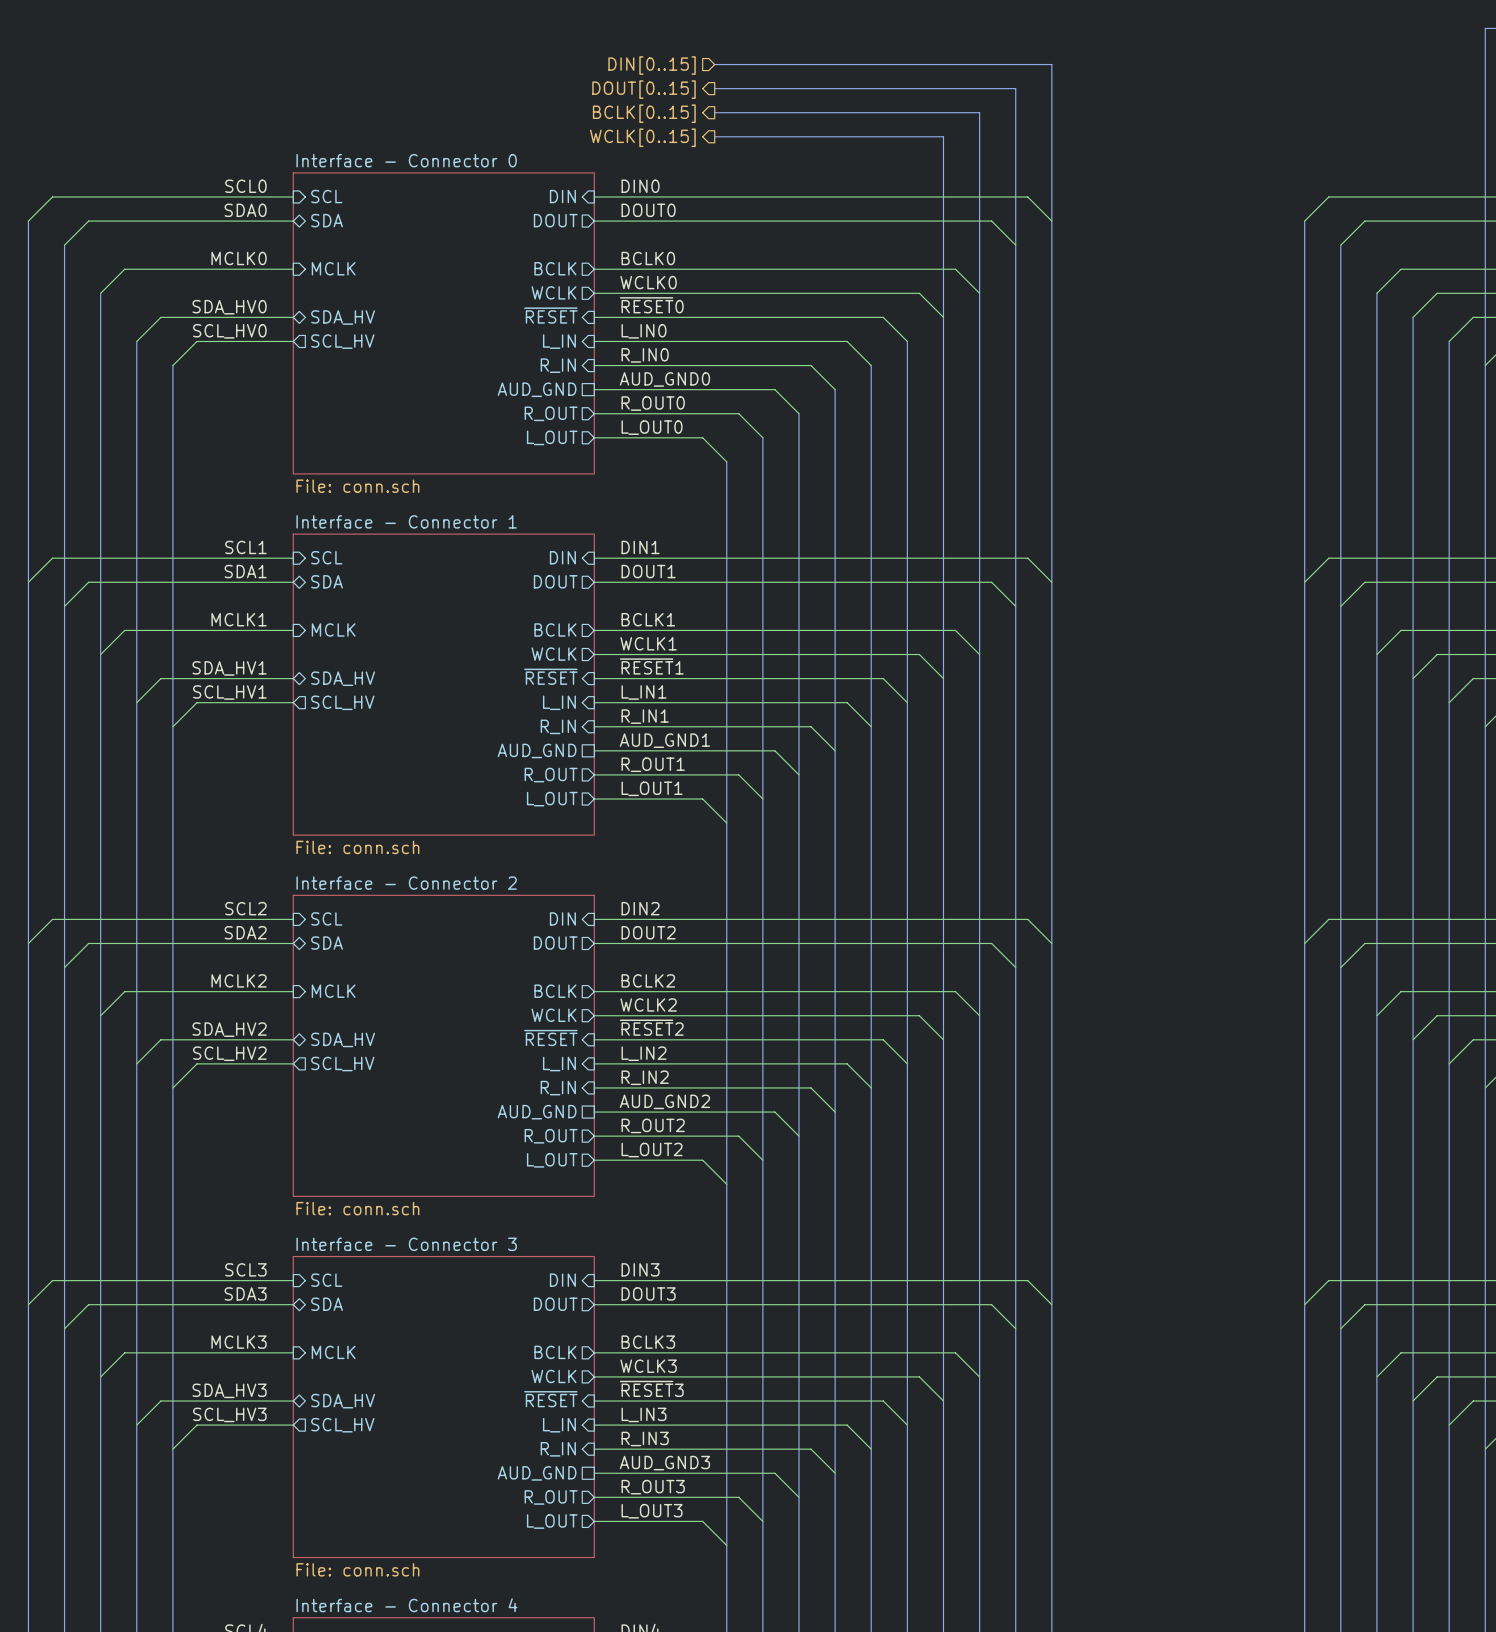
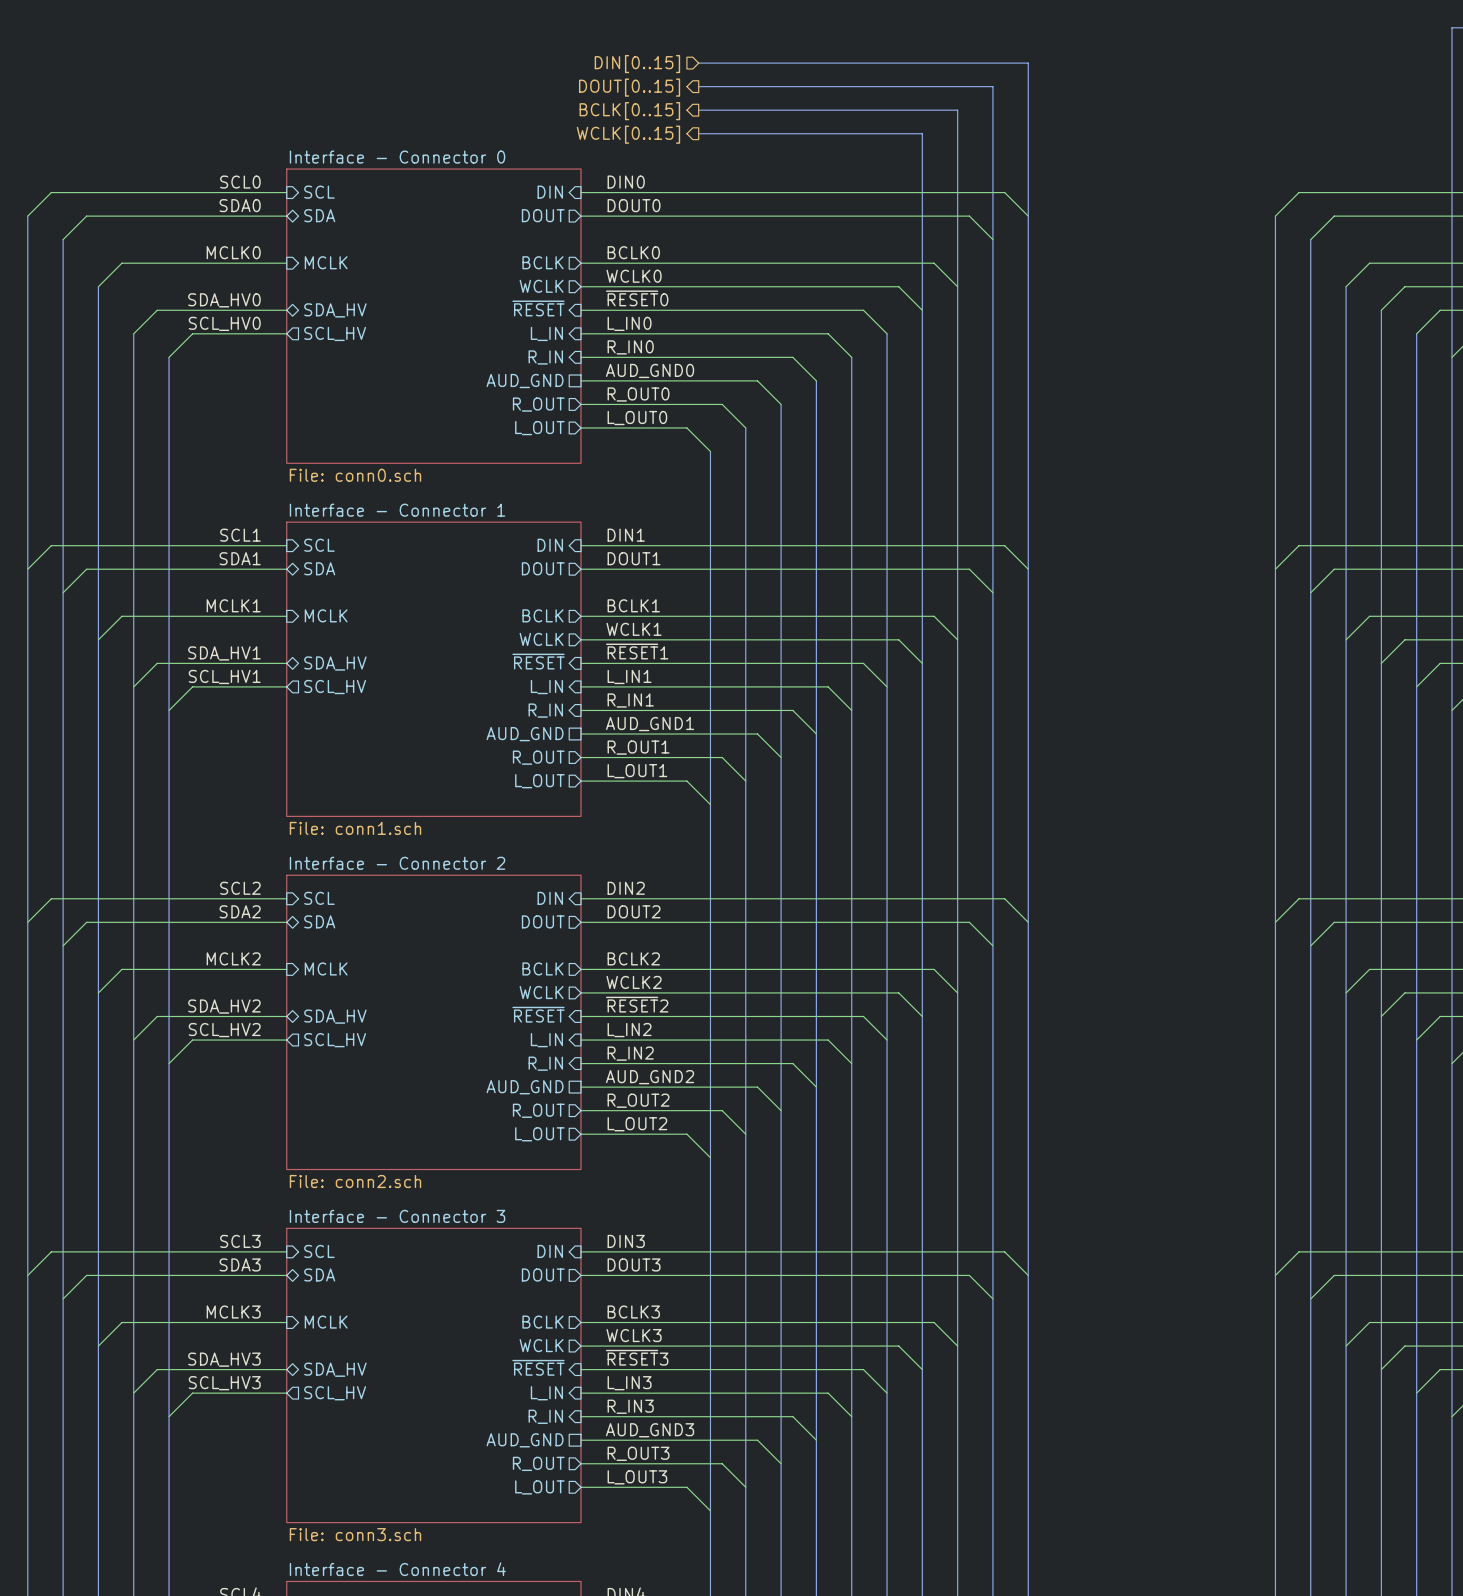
sheet Interface - Connector 0 value: File: conn.sch (357, 486) -> File: conn0.sch (355, 475)
sheet Interface - Connector 1 value: File: conn.sch (357, 847) -> File: conn1.sch (355, 828)
sheet Interface - Connector 2 value: File: conn.sch (357, 1208) -> File: conn2.sch (355, 1181)
sheet Interface - Connector 3 value: File: conn.sch (357, 1569) -> File: conn3.sch (355, 1534)

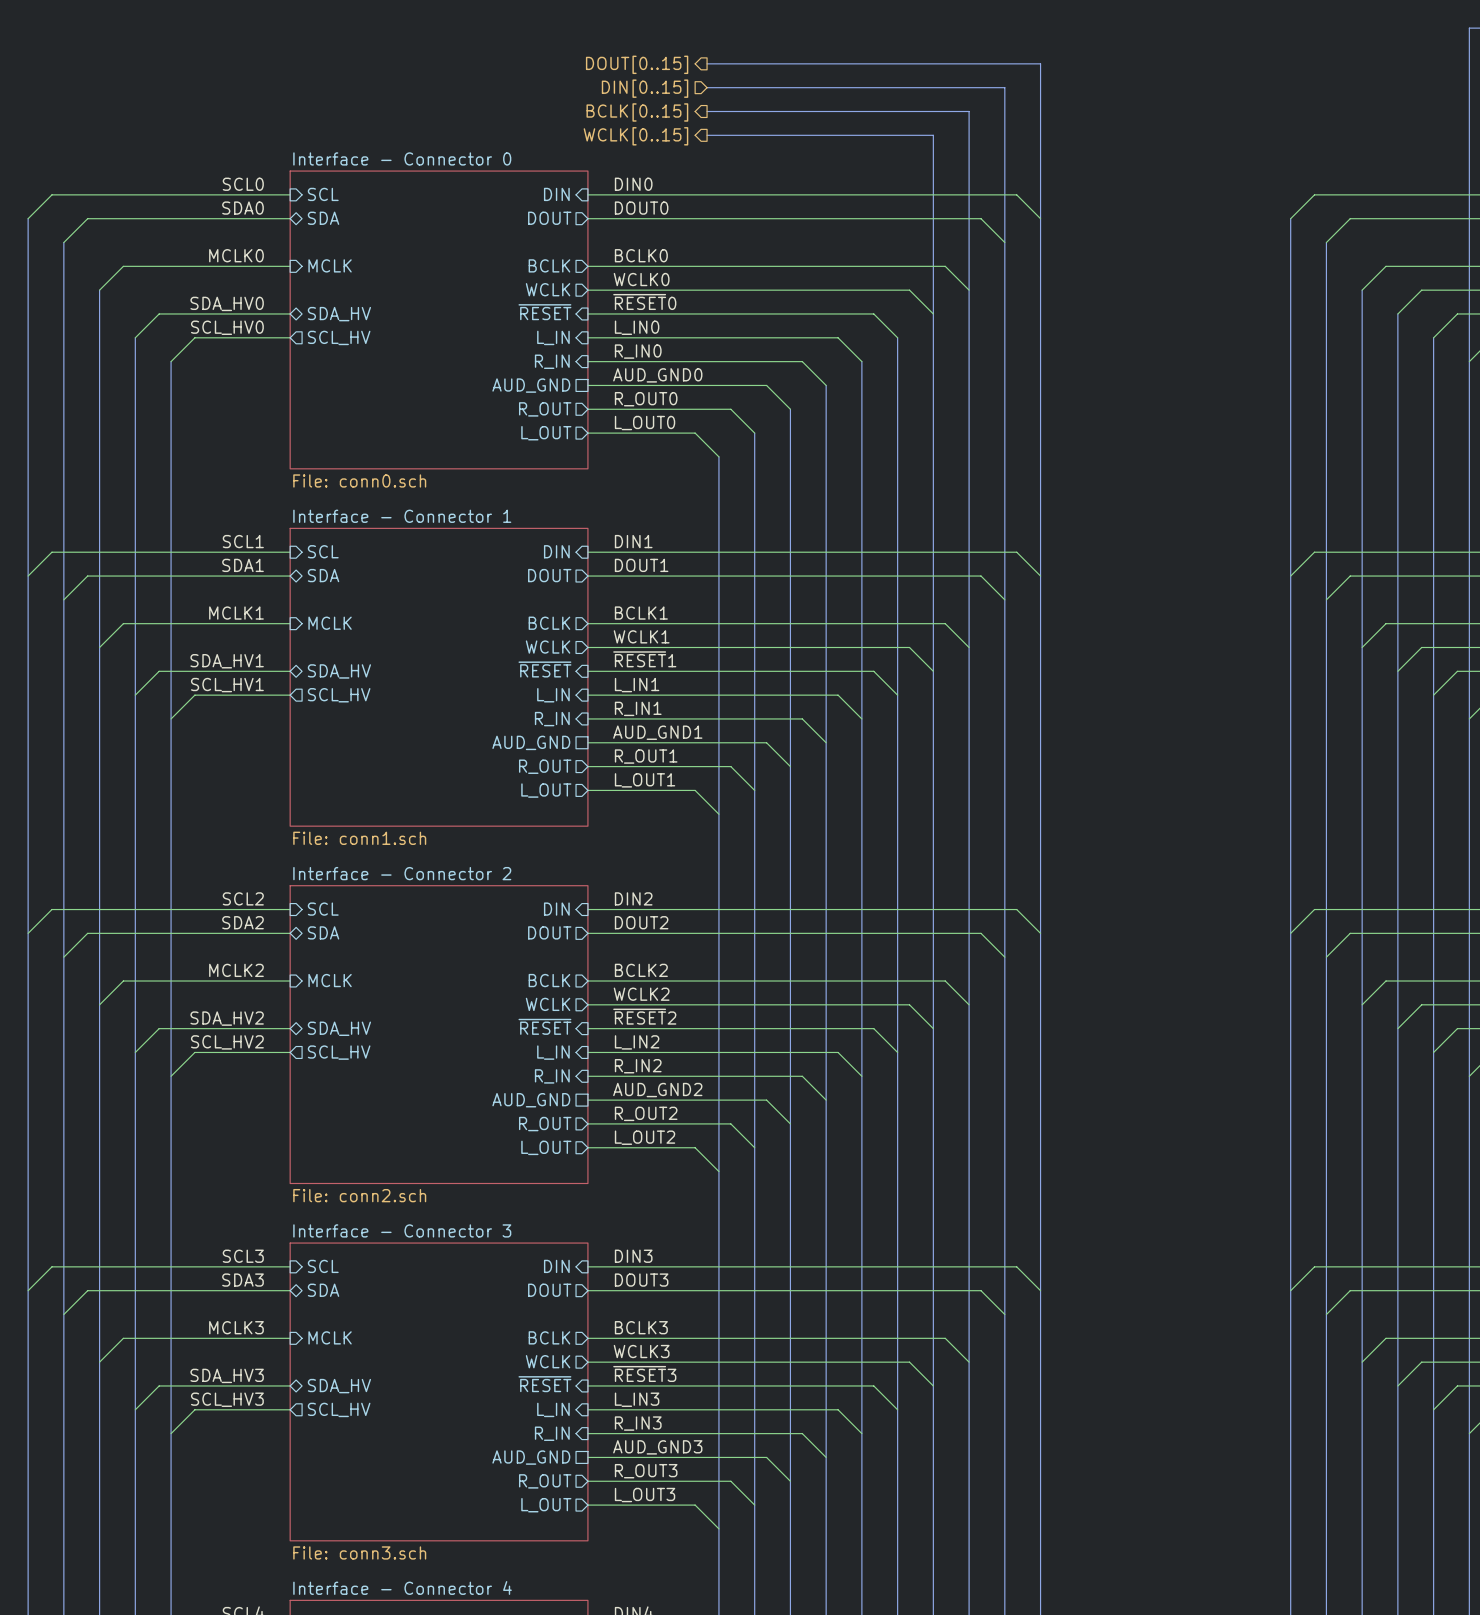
hierarchical label shape: input (637, 64) -> output (637, 64)
hierarchical label: DIN[0..15] (637, 64) -> DOUT[0..15] (637, 64)
hierarchical label shape: output (629, 87) -> input (645, 88)
hierarchical label: DOUT[0..15] (629, 87) -> DIN[0..15] (645, 88)

